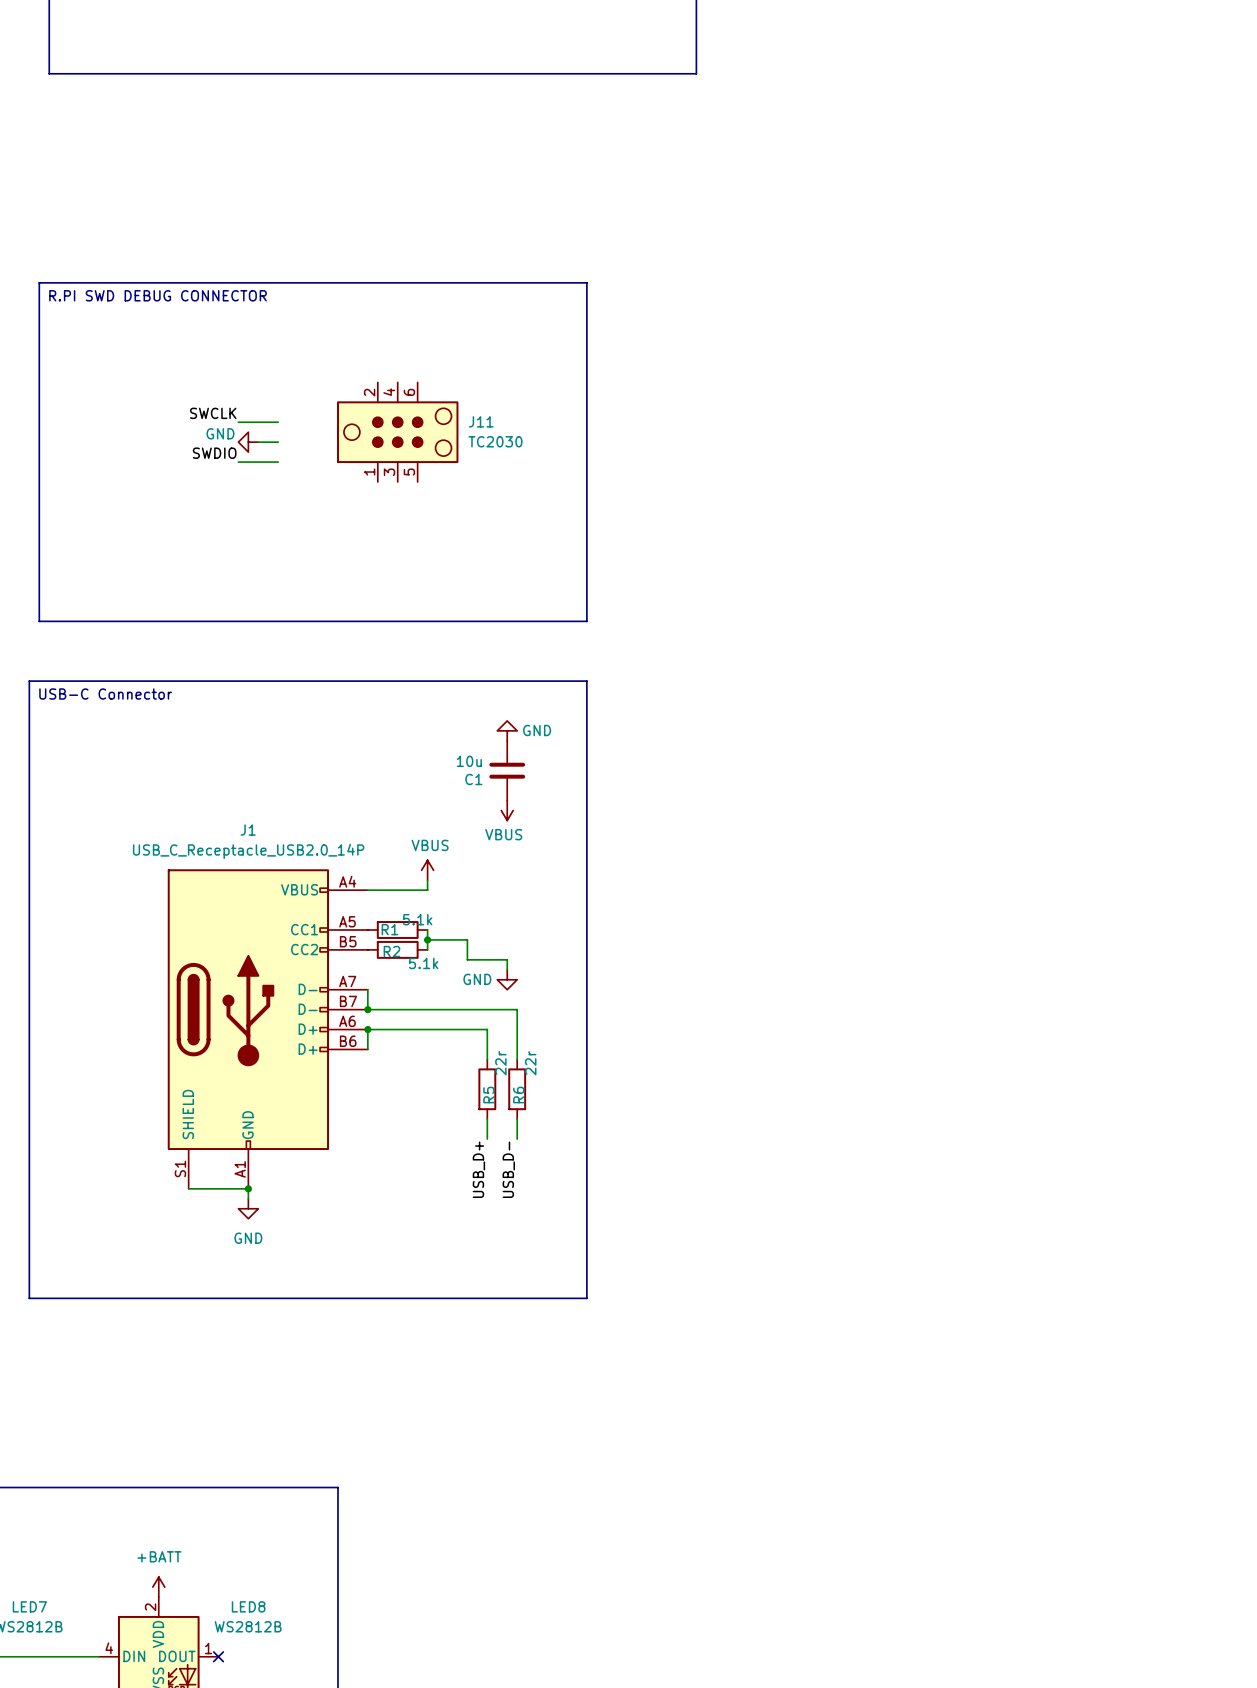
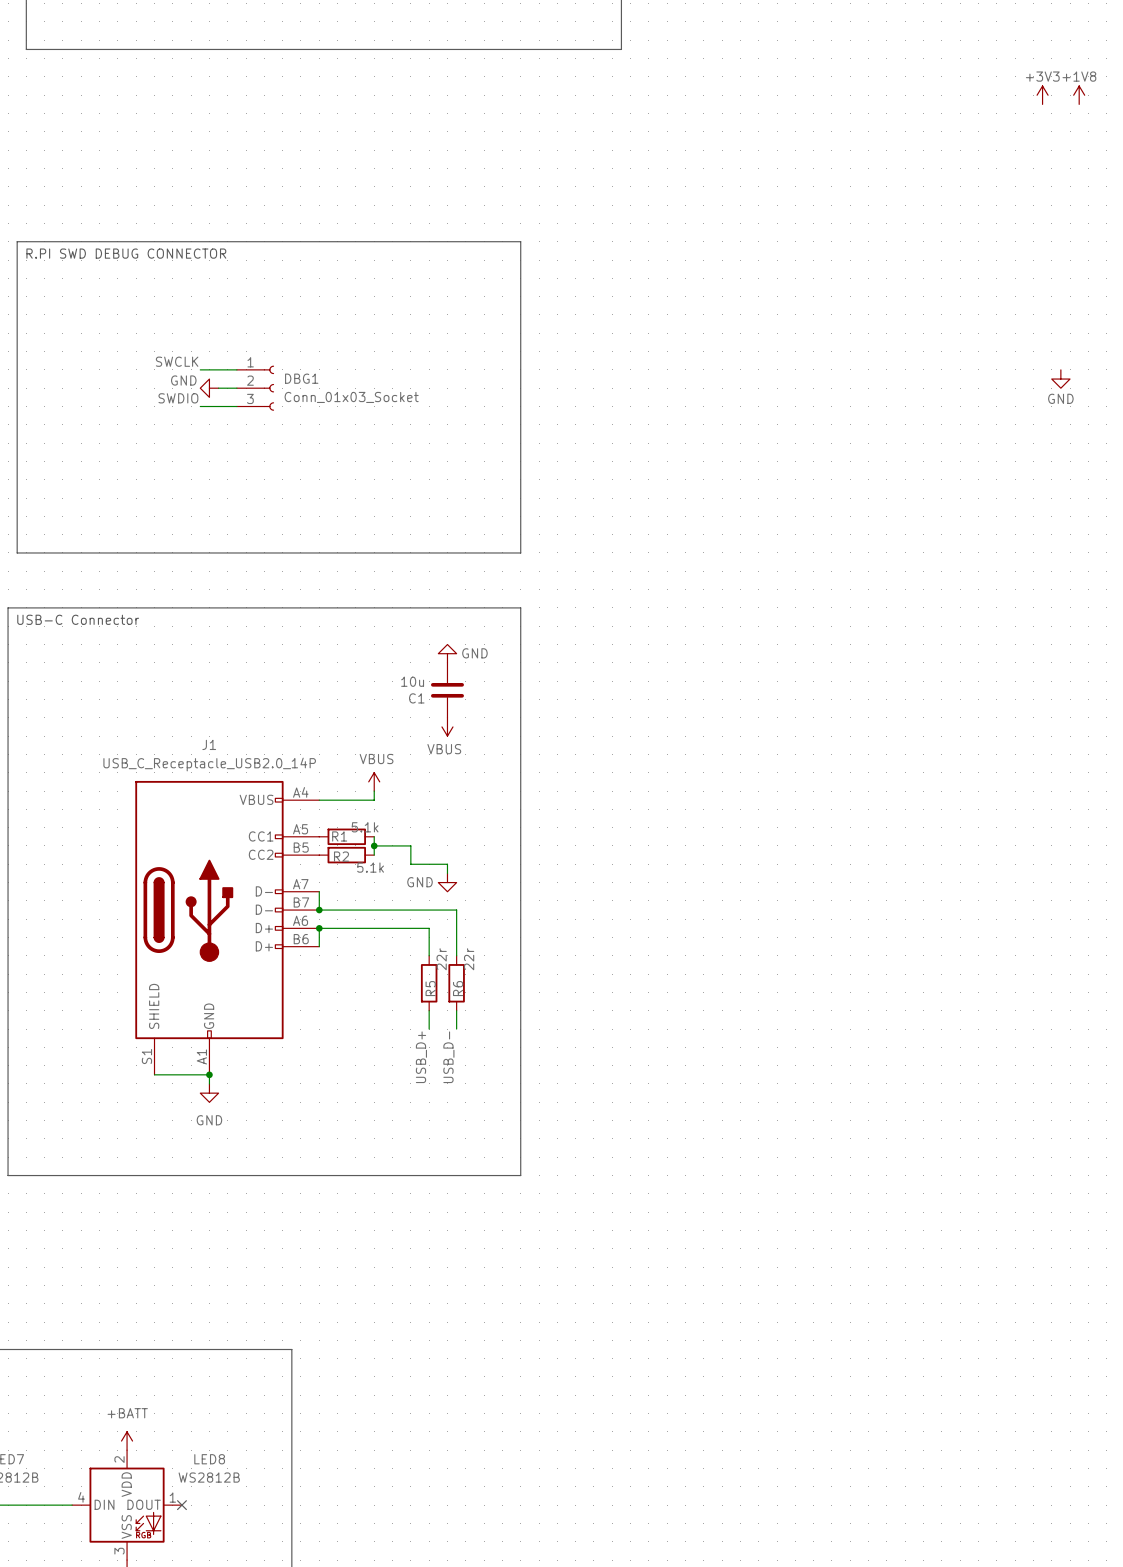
power symbol: none -> +3V3 (1042, 95)
power symbol: none -> +1V8 (1079, 95)
J11: TC2030 (397, 432) -> none
power symbol: none -> GND (1060, 379)
DBG1: none -> Conn_01x03_Socket (255, 388)

